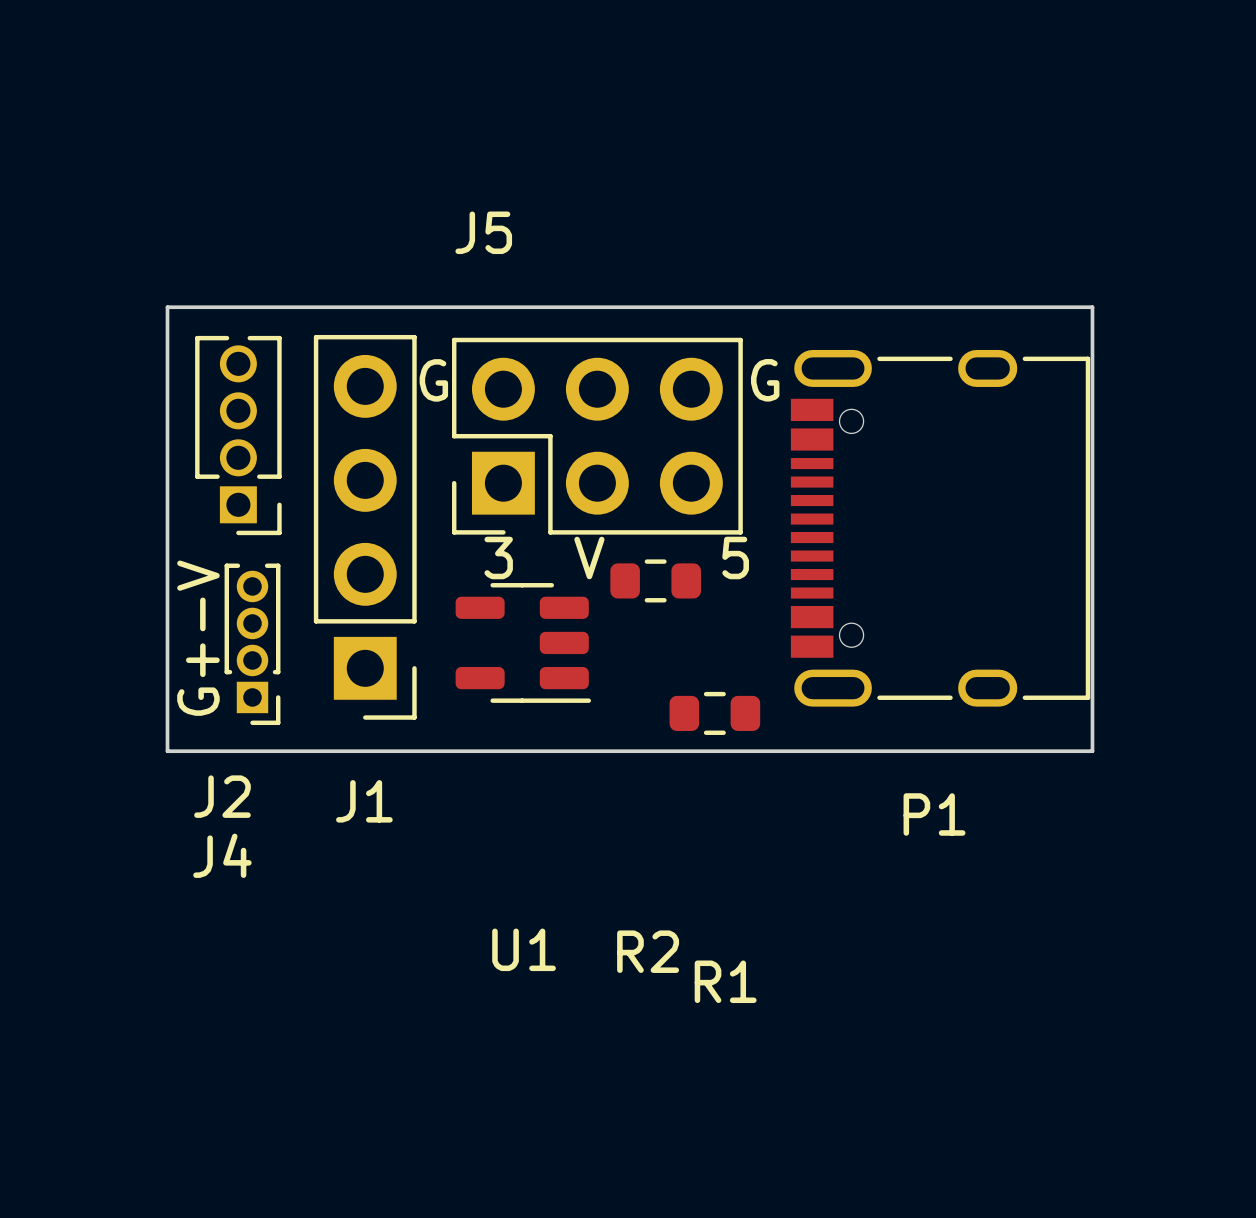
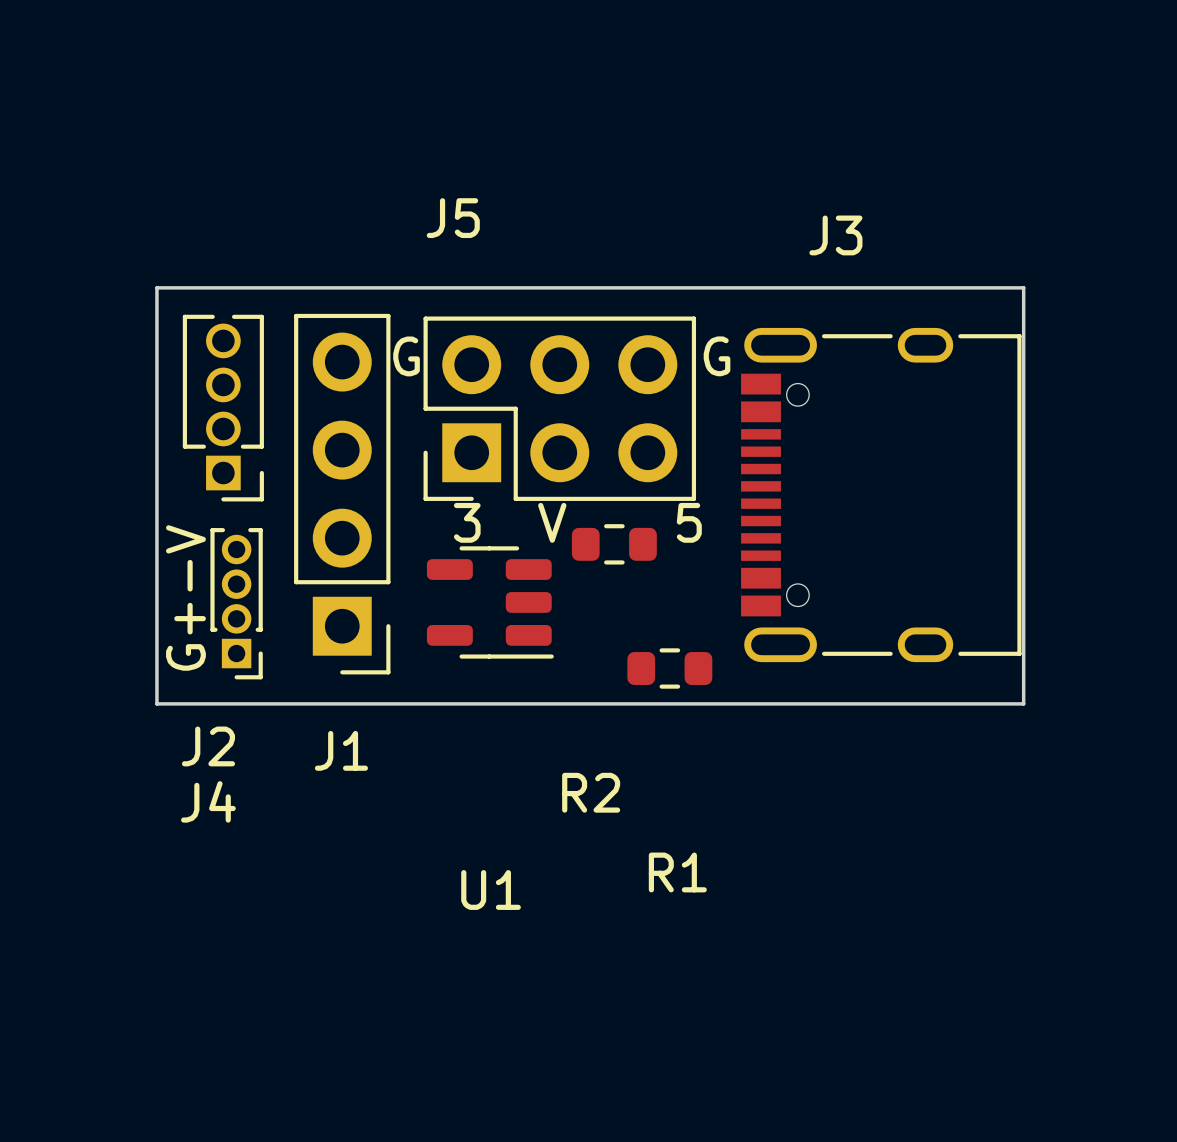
P1 name: P1 (934, 814) -> J3 (835, 235)
R2 name position: R2 (648, 951) -> R2 (591, 792)
R1 name position: R1 (725, 981) -> R1 (677, 872)

